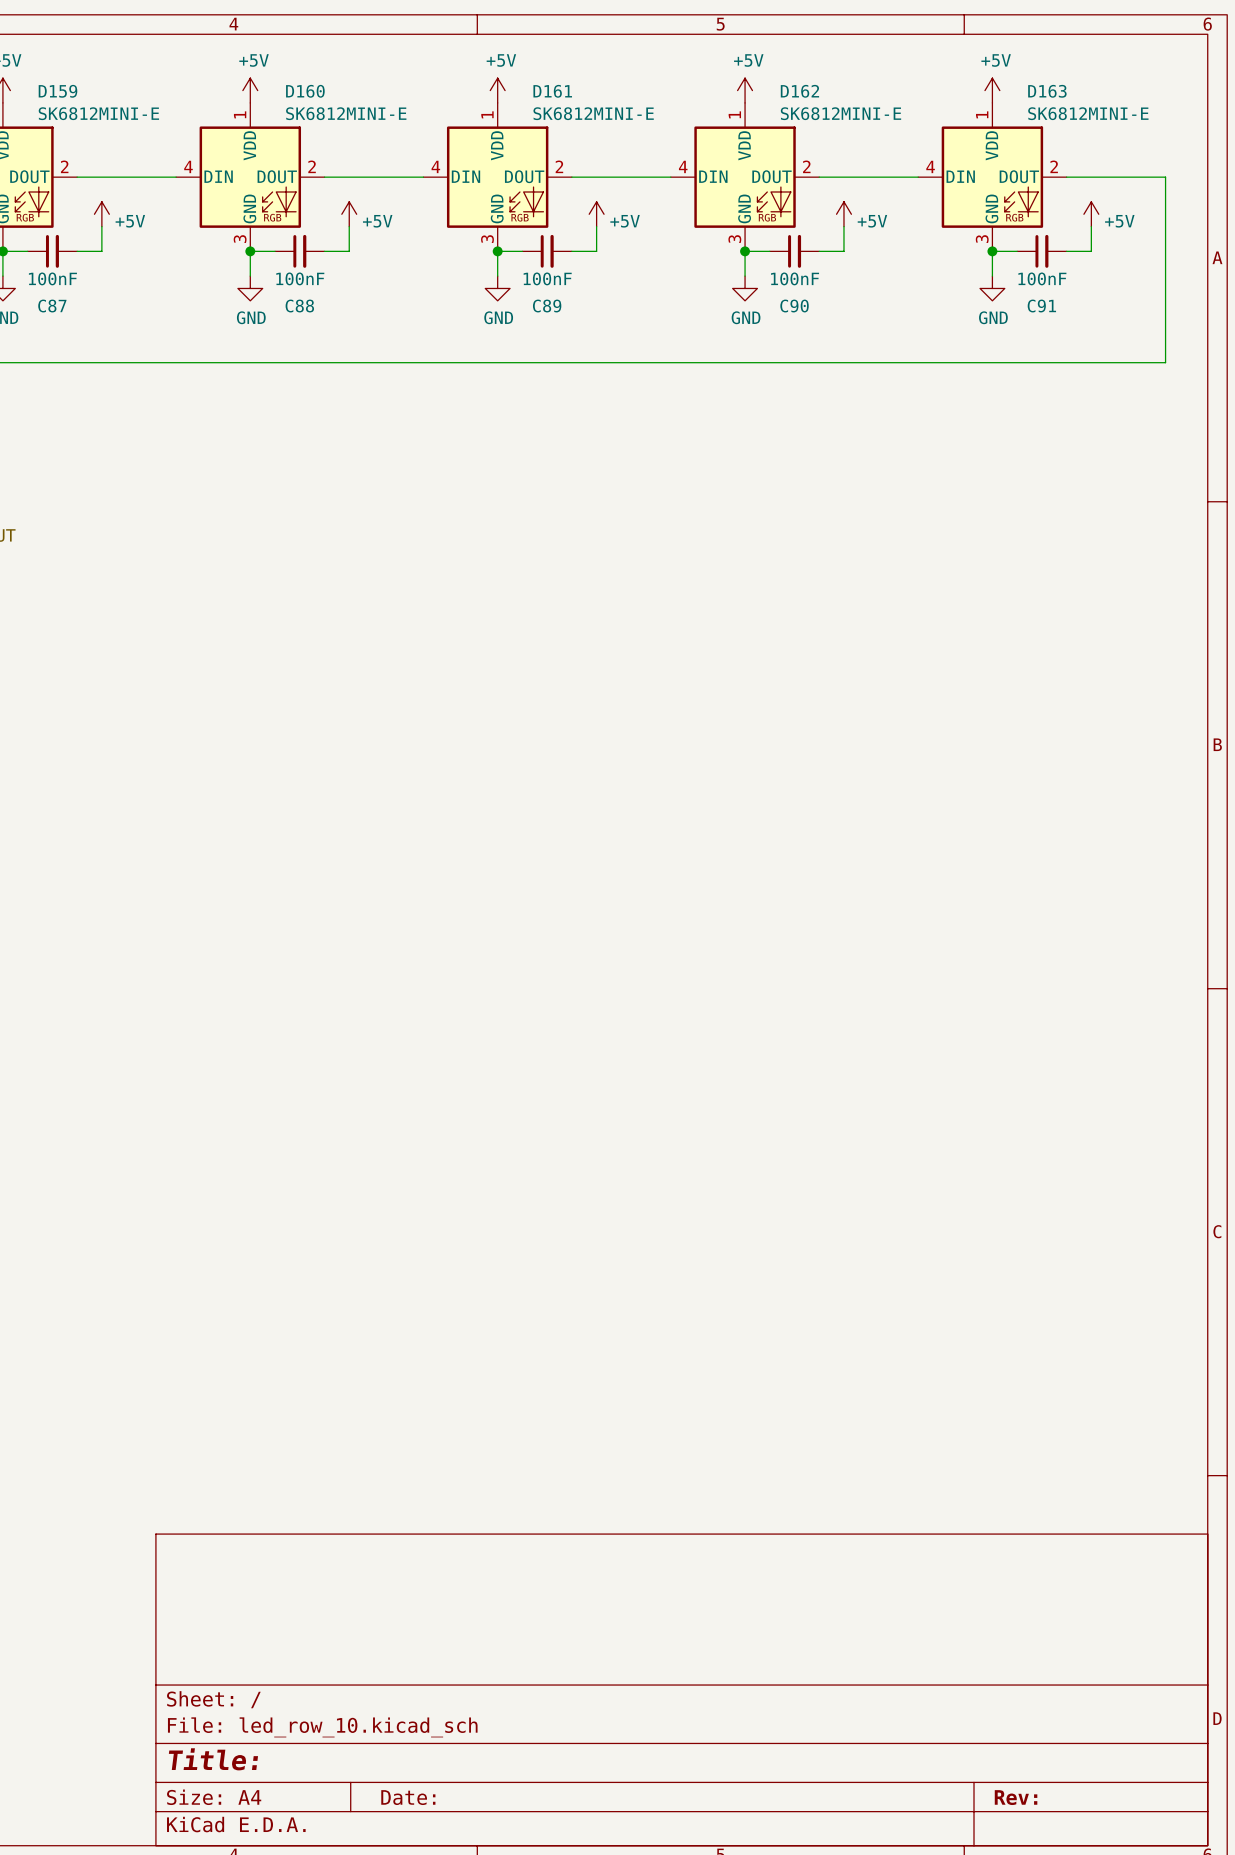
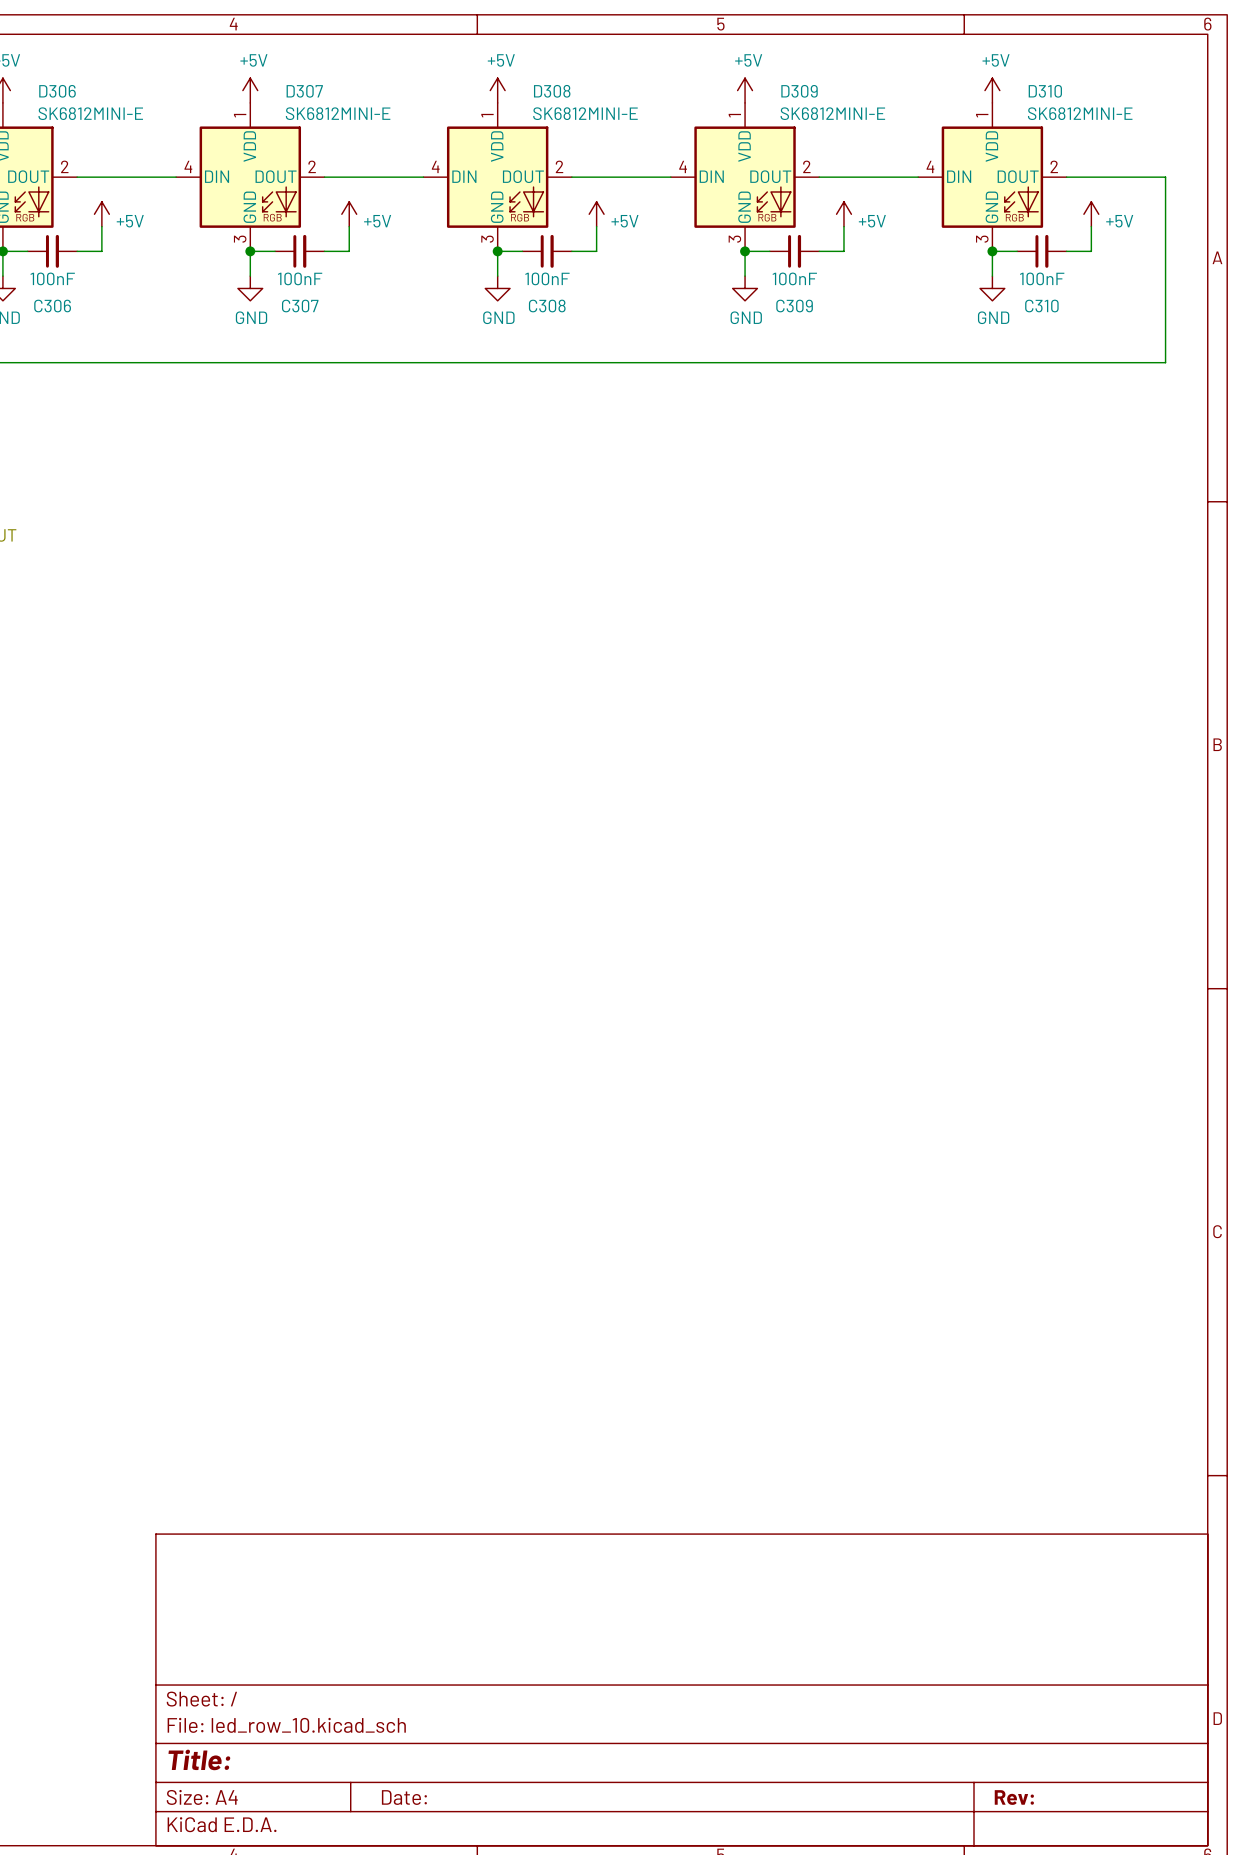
D159 name: D159 (57, 91) -> D306 (57, 91)
D160 name: D160 (305, 91) -> D307 (304, 91)
D161 name: D161 (552, 91) -> D308 (552, 91)
D162 name: D162 (799, 91) -> D309 (799, 91)
D163 name: D163 (1047, 91) -> D310 (1045, 91)
C87 name: C87 (52, 306) -> C306 (52, 306)
C88 name: C88 (299, 306) -> C307 (300, 306)
C89 name: C89 (547, 306) -> C308 (547, 306)
C90 name: C90 (794, 306) -> C309 (794, 306)
C91 name: C91 (1041, 306) -> C310 (1041, 306)

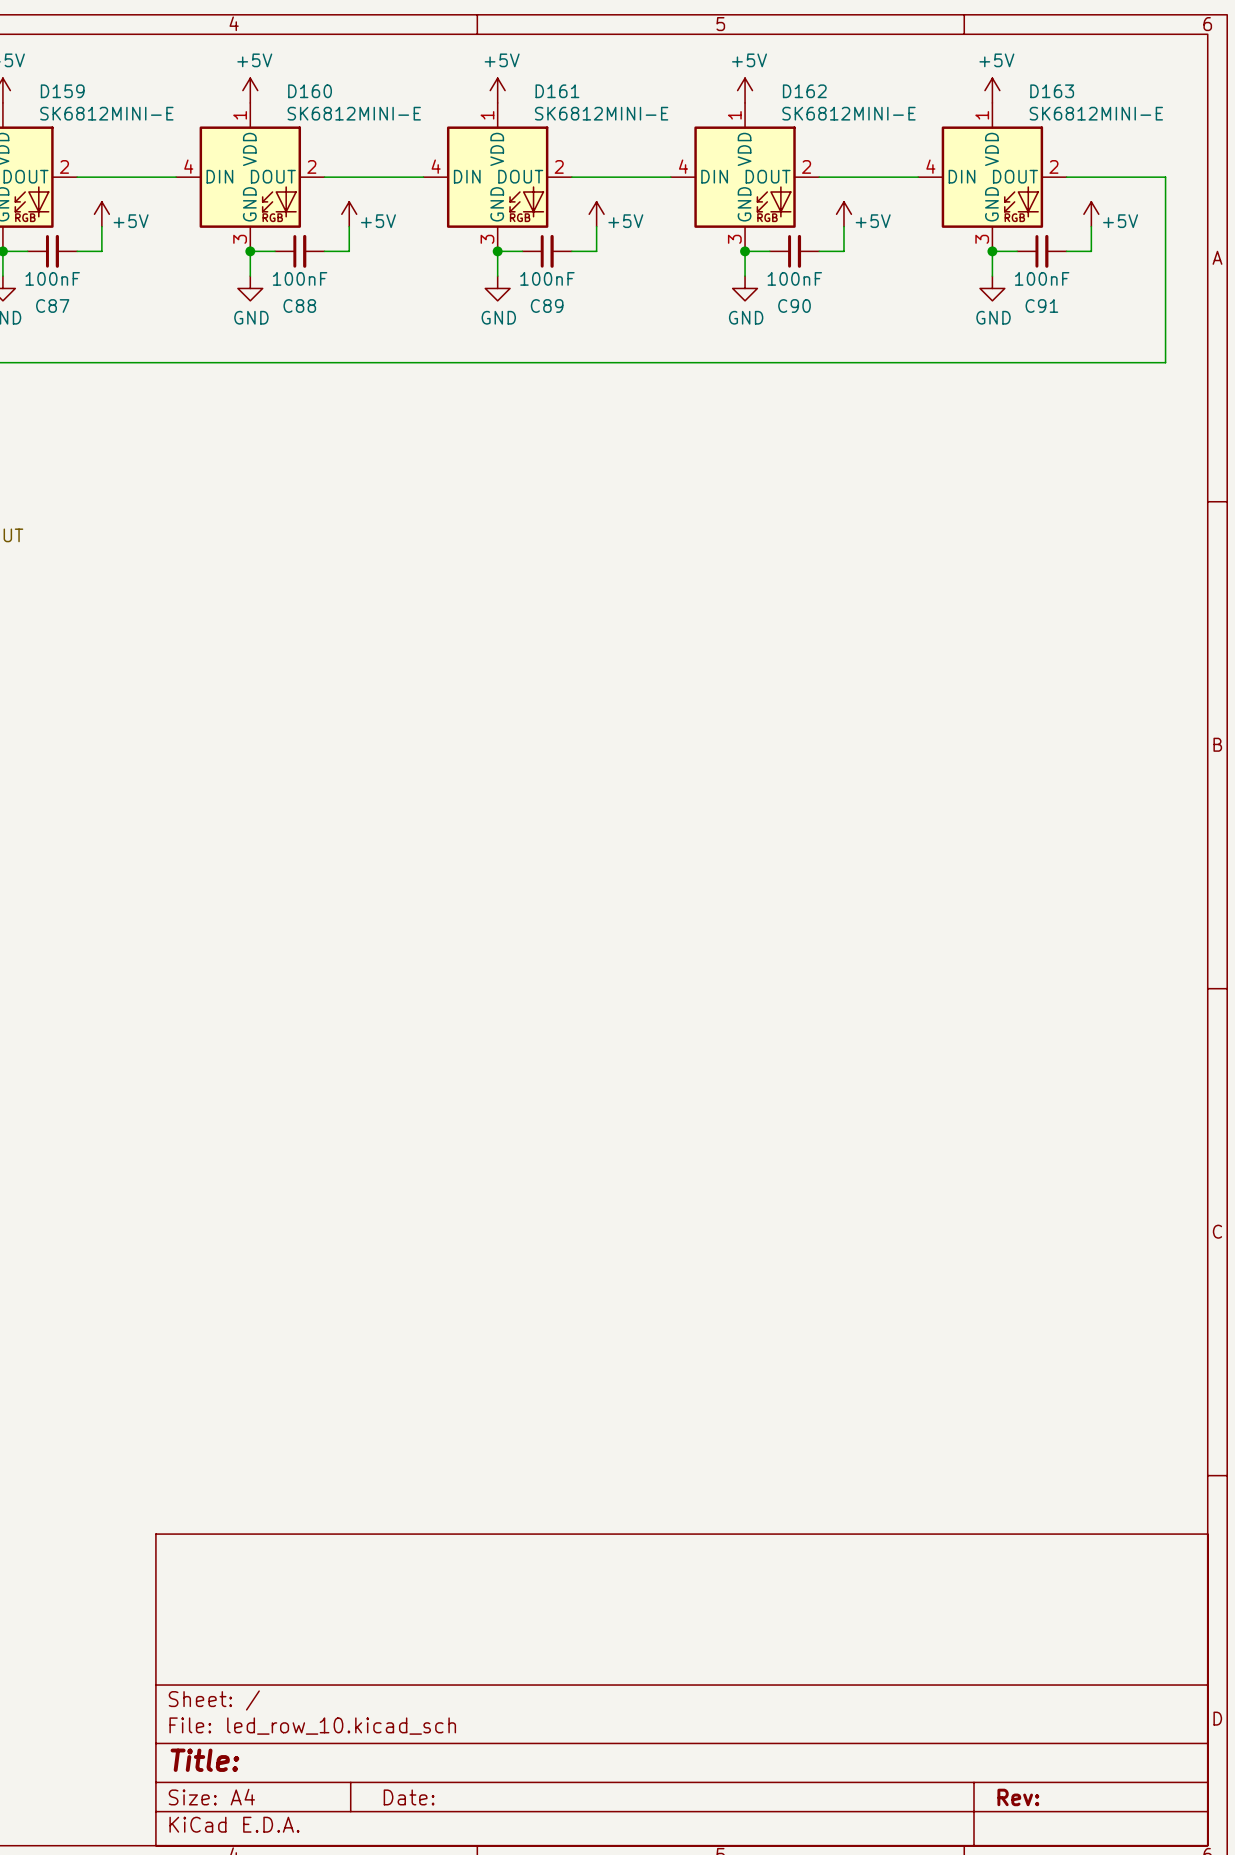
D306 name: D306 (57, 91) -> D159 (62, 91)
D307 name: D307 (304, 91) -> D160 (310, 91)
D308 name: D308 (552, 91) -> D161 (557, 91)
D309 name: D309 (799, 91) -> D162 (804, 91)
D310 name: D310 (1045, 91) -> D163 (1052, 91)
C306 name: C306 (52, 306) -> C87 (52, 306)
C307 name: C307 (300, 306) -> C88 (299, 306)
C308 name: C308 (547, 306) -> C89 (547, 306)
C309 name: C309 (794, 306) -> C90 (794, 306)
C310 name: C310 (1041, 306) -> C91 (1041, 306)

